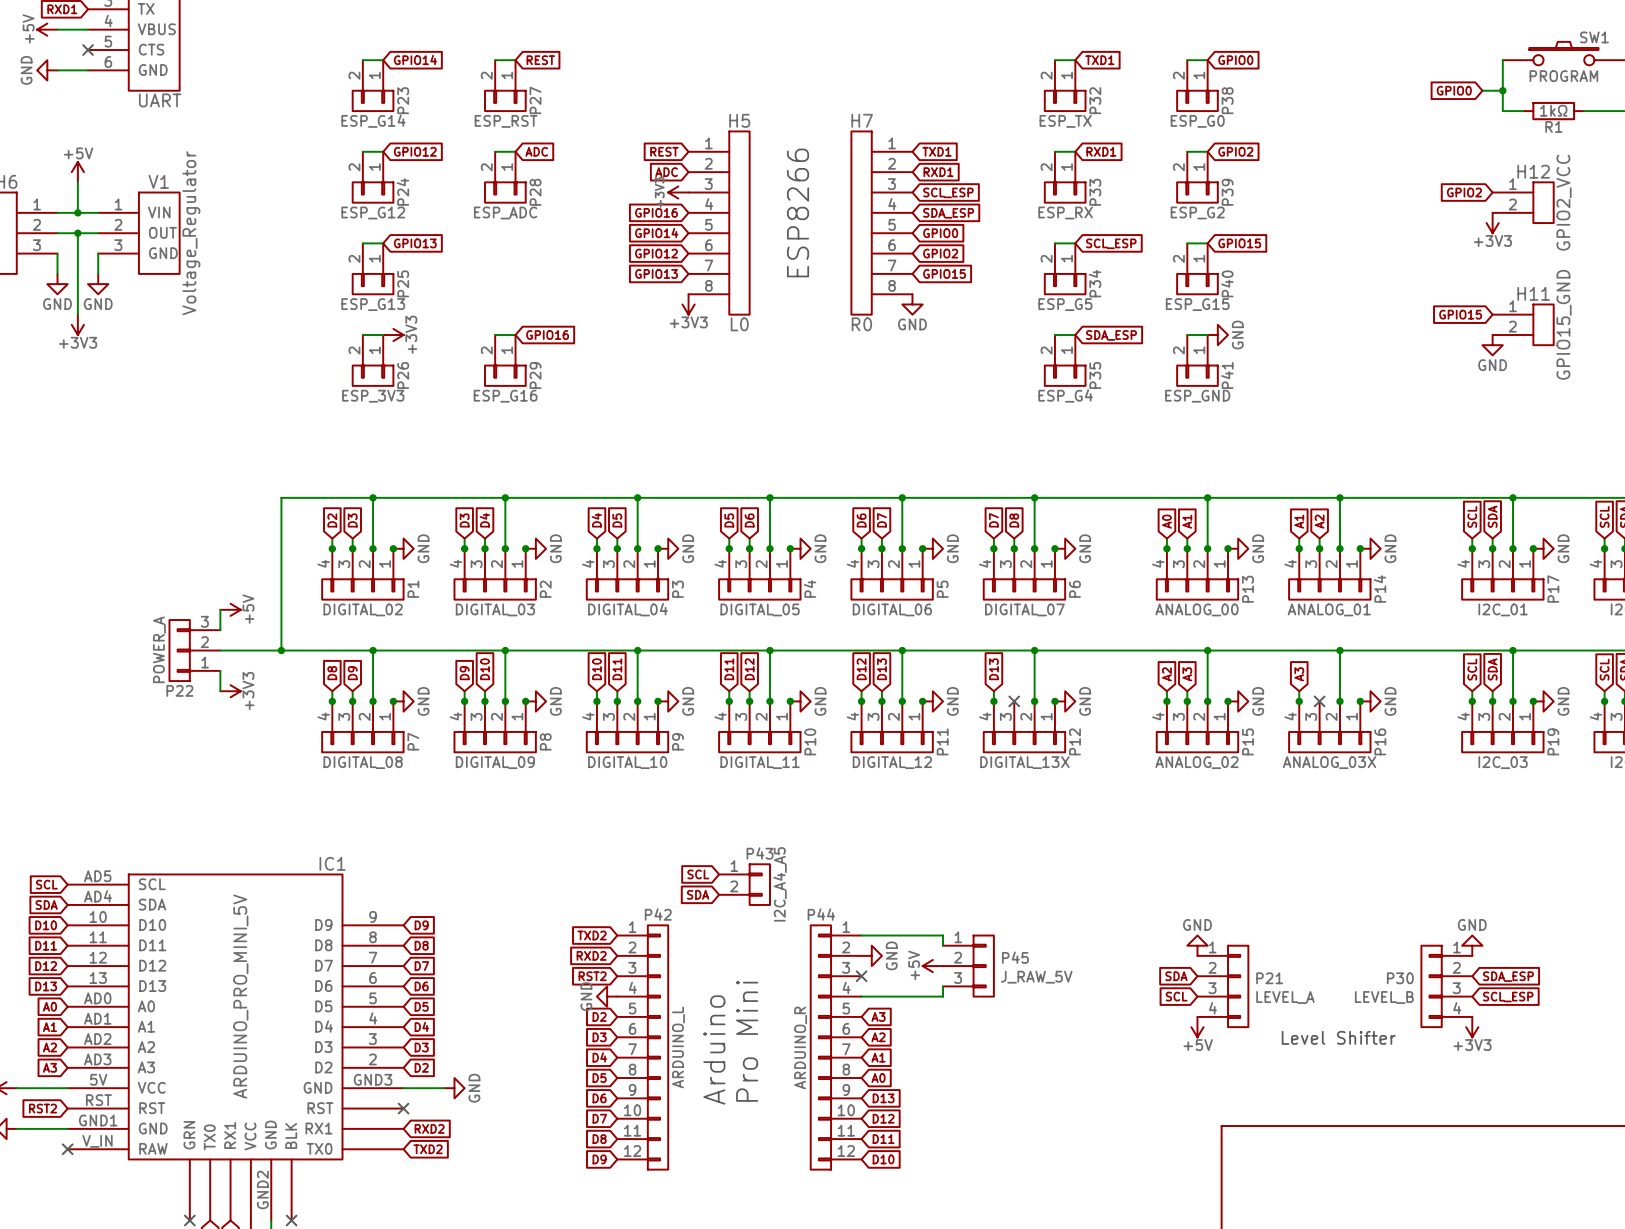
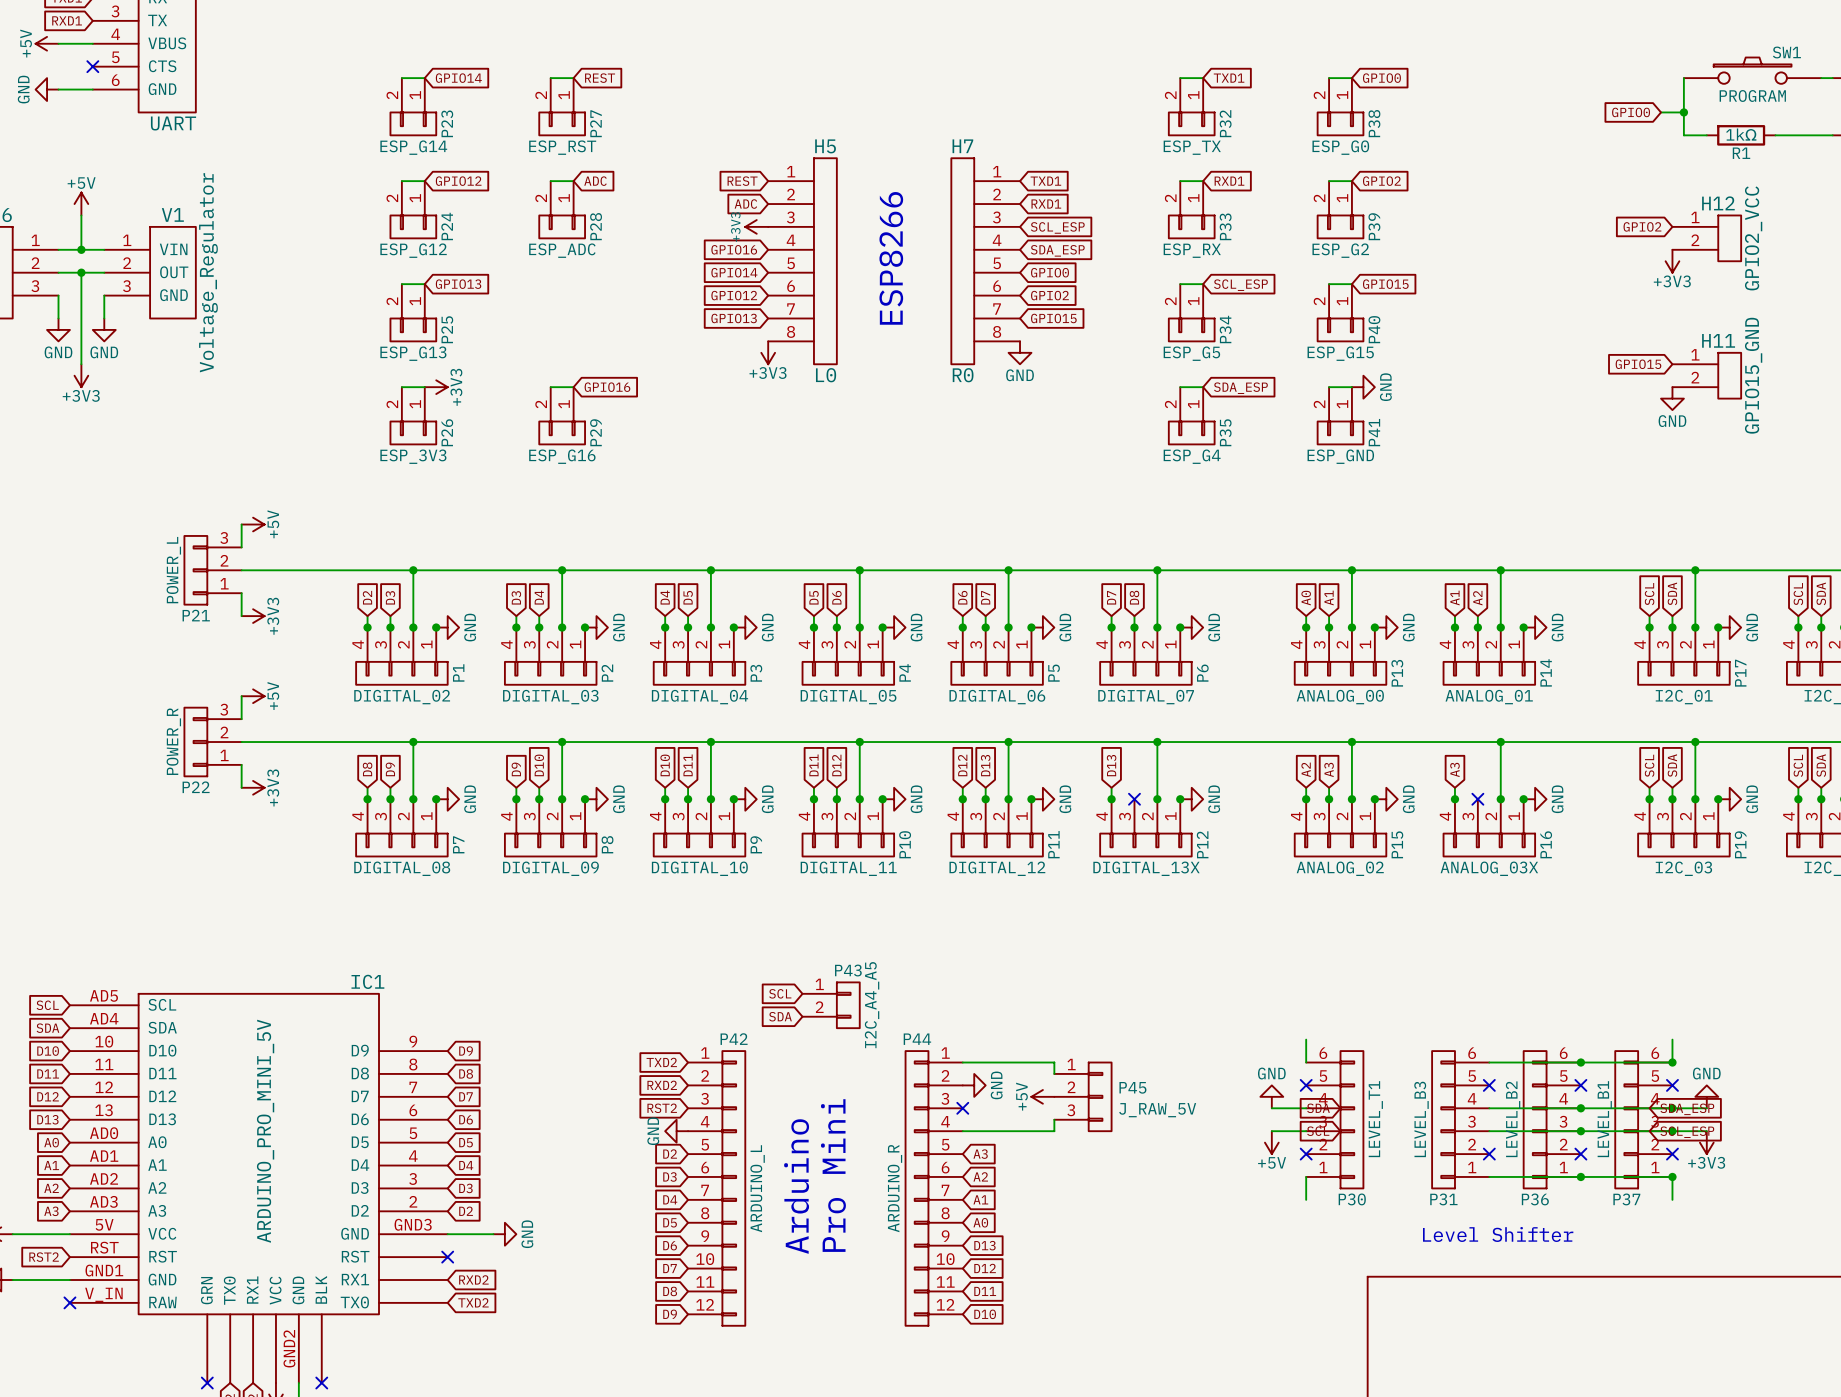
wire: none -> (241, 524) (241, 547)
power symbol: none -> +5V (253, 524)
wire: (281, 497) (281, 650) -> (310, 570) (241, 570)
wire: none -> (241, 593) (241, 616)
power symbol: none -> +3V3 (253, 616)
P22 value: POWER_A (159, 649) -> POWER_R (173, 741)
junction: (281, 650) -> none
wire: none -> (1306, 1039) (1306, 1062)
wire: none -> (1672, 1039) (1672, 1062) (1489, 1062)
junction: none -> (1580, 1062)
junction: none -> (1672, 1062)
P21 symbol: [1197, 945, 1249, 1028] -> [184, 535, 242, 605]
power symbol position: GND (1197, 945) -> GND (1271, 1096)
P30 symbol: [1421, 945, 1473, 1028] -> [1306, 1051, 1364, 1189]
power symbol position: GND (1472, 945) -> GND (1706, 1096)
no-connect mark: none -> (1306, 1085)
no-connect mark: none -> (1489, 1085)
no-connect mark: none -> (1580, 1085)
no-connect mark: none -> (1672, 1085)
wire: none -> (1271, 1108) (1306, 1108)
wire: none -> (1489, 1108) (1706, 1108)
junction: none -> (1580, 1108)
junction: none -> (1672, 1108)
P21 name position: P21 (1269, 978) -> P21 (196, 615)
P30 name position: P30 (1400, 978) -> P30 (1352, 1199)
P31: none -> LEVEL_B3 (1460, 1119)
P36: none -> LEVEL_B2 (1552, 1119)
P37: none -> LEVEL_B1 (1643, 1119)
wire: none -> (1271, 1131) (1306, 1131)
wire: none -> (1489, 1131) (1706, 1131)
junction: none -> (1580, 1131)
junction: none -> (1672, 1131)
P21 value: LEVEL_A (1285, 997) -> POWER_L (173, 570)
P30 value: LEVEL_B (1384, 997) -> LEVEL_T1 (1375, 1119)
no-connect mark: none -> (1306, 1154)
no-connect mark: none -> (1489, 1154)
no-connect mark: none -> (1580, 1154)
no-connect mark: none -> (1672, 1154)
power symbol position: +5V (1197, 1027) -> +5V (1271, 1142)
power symbol position: +3V3 (1472, 1027) -> +3V3 (1706, 1142)
wire: none -> (1306, 1176) (1306, 1199)
wire: none -> (1489, 1176) (1672, 1176) (1672, 1199)
text position: Level Shifter (1338, 1037) -> Level Shifter (1498, 1234)
junction: none -> (1580, 1176)
junction: none -> (1672, 1176)

